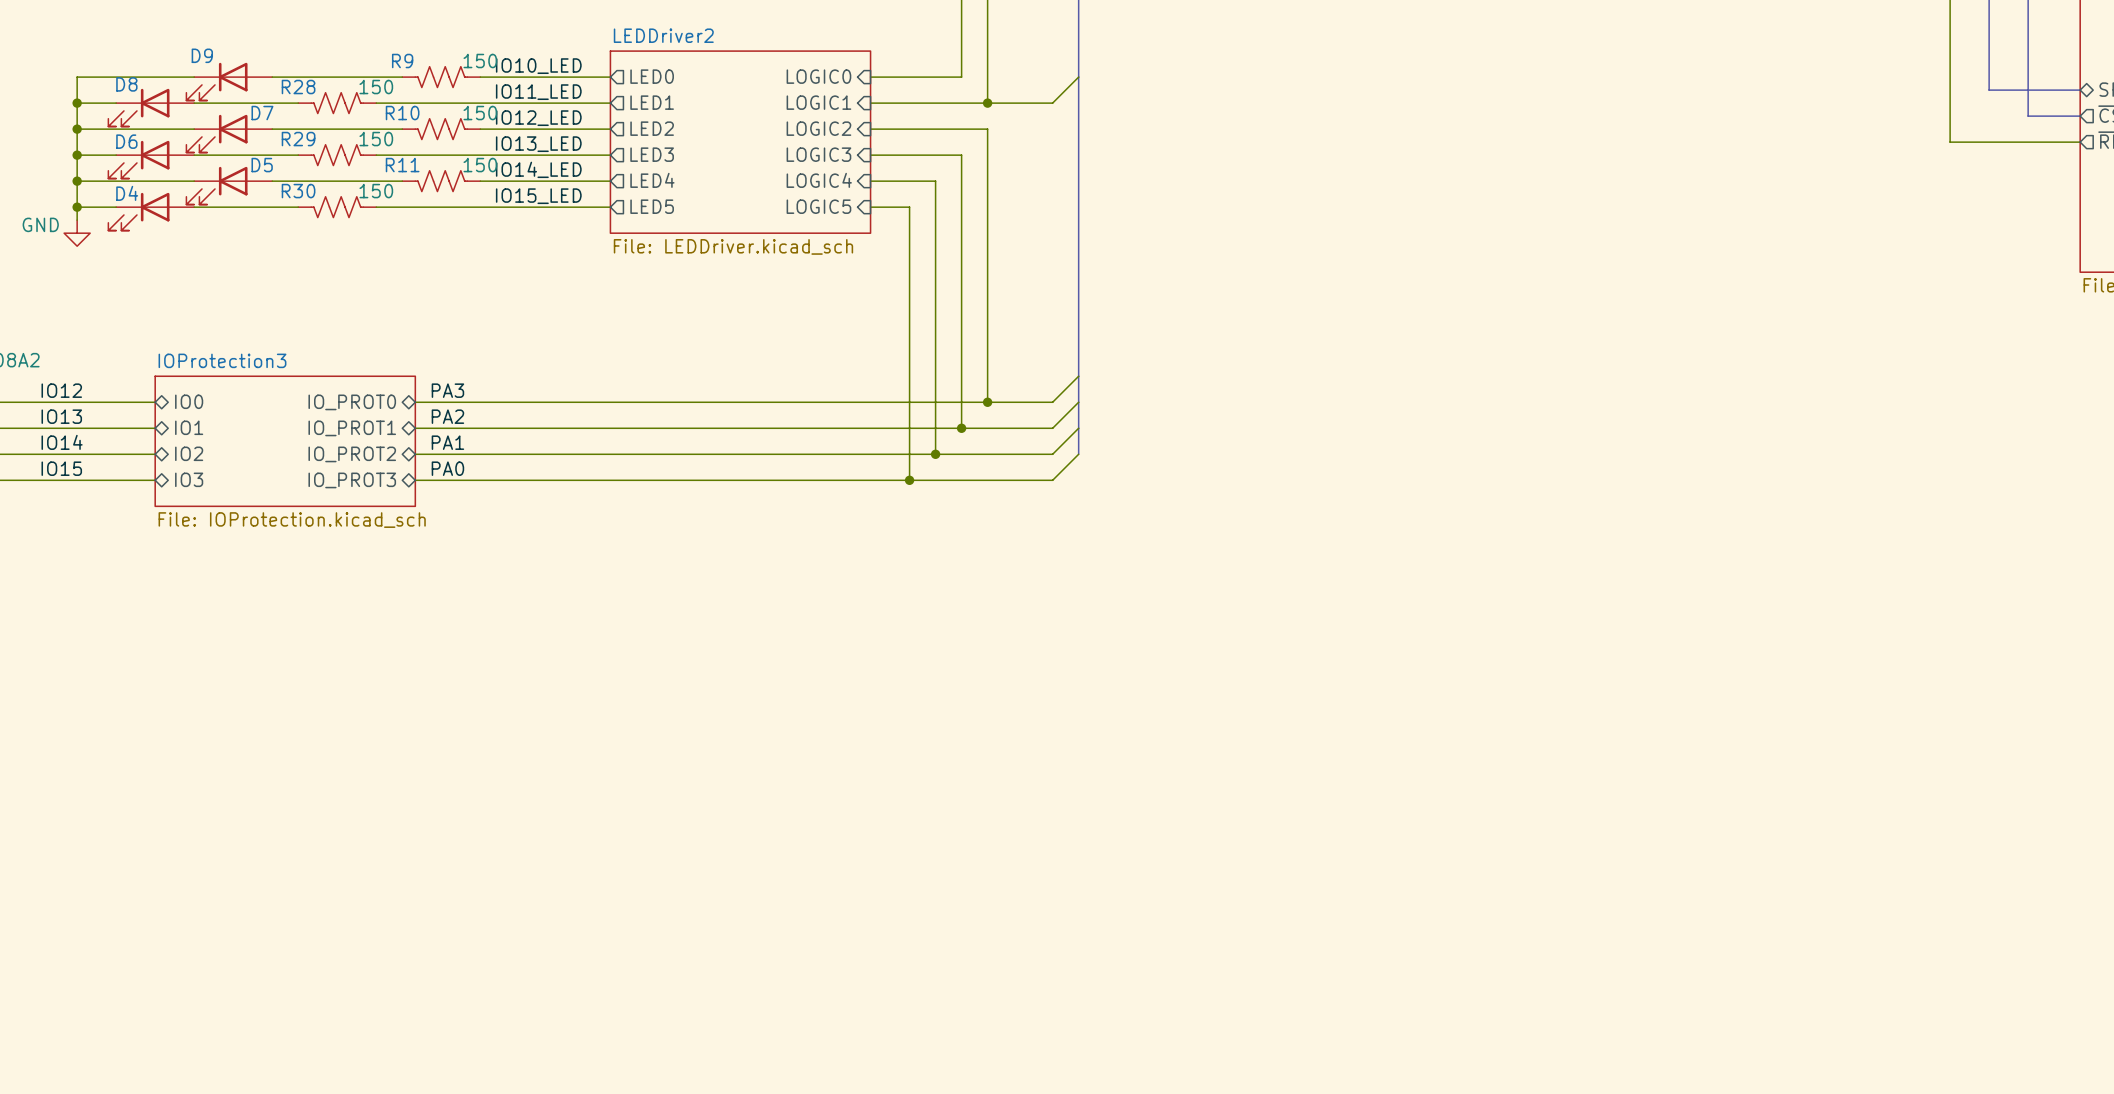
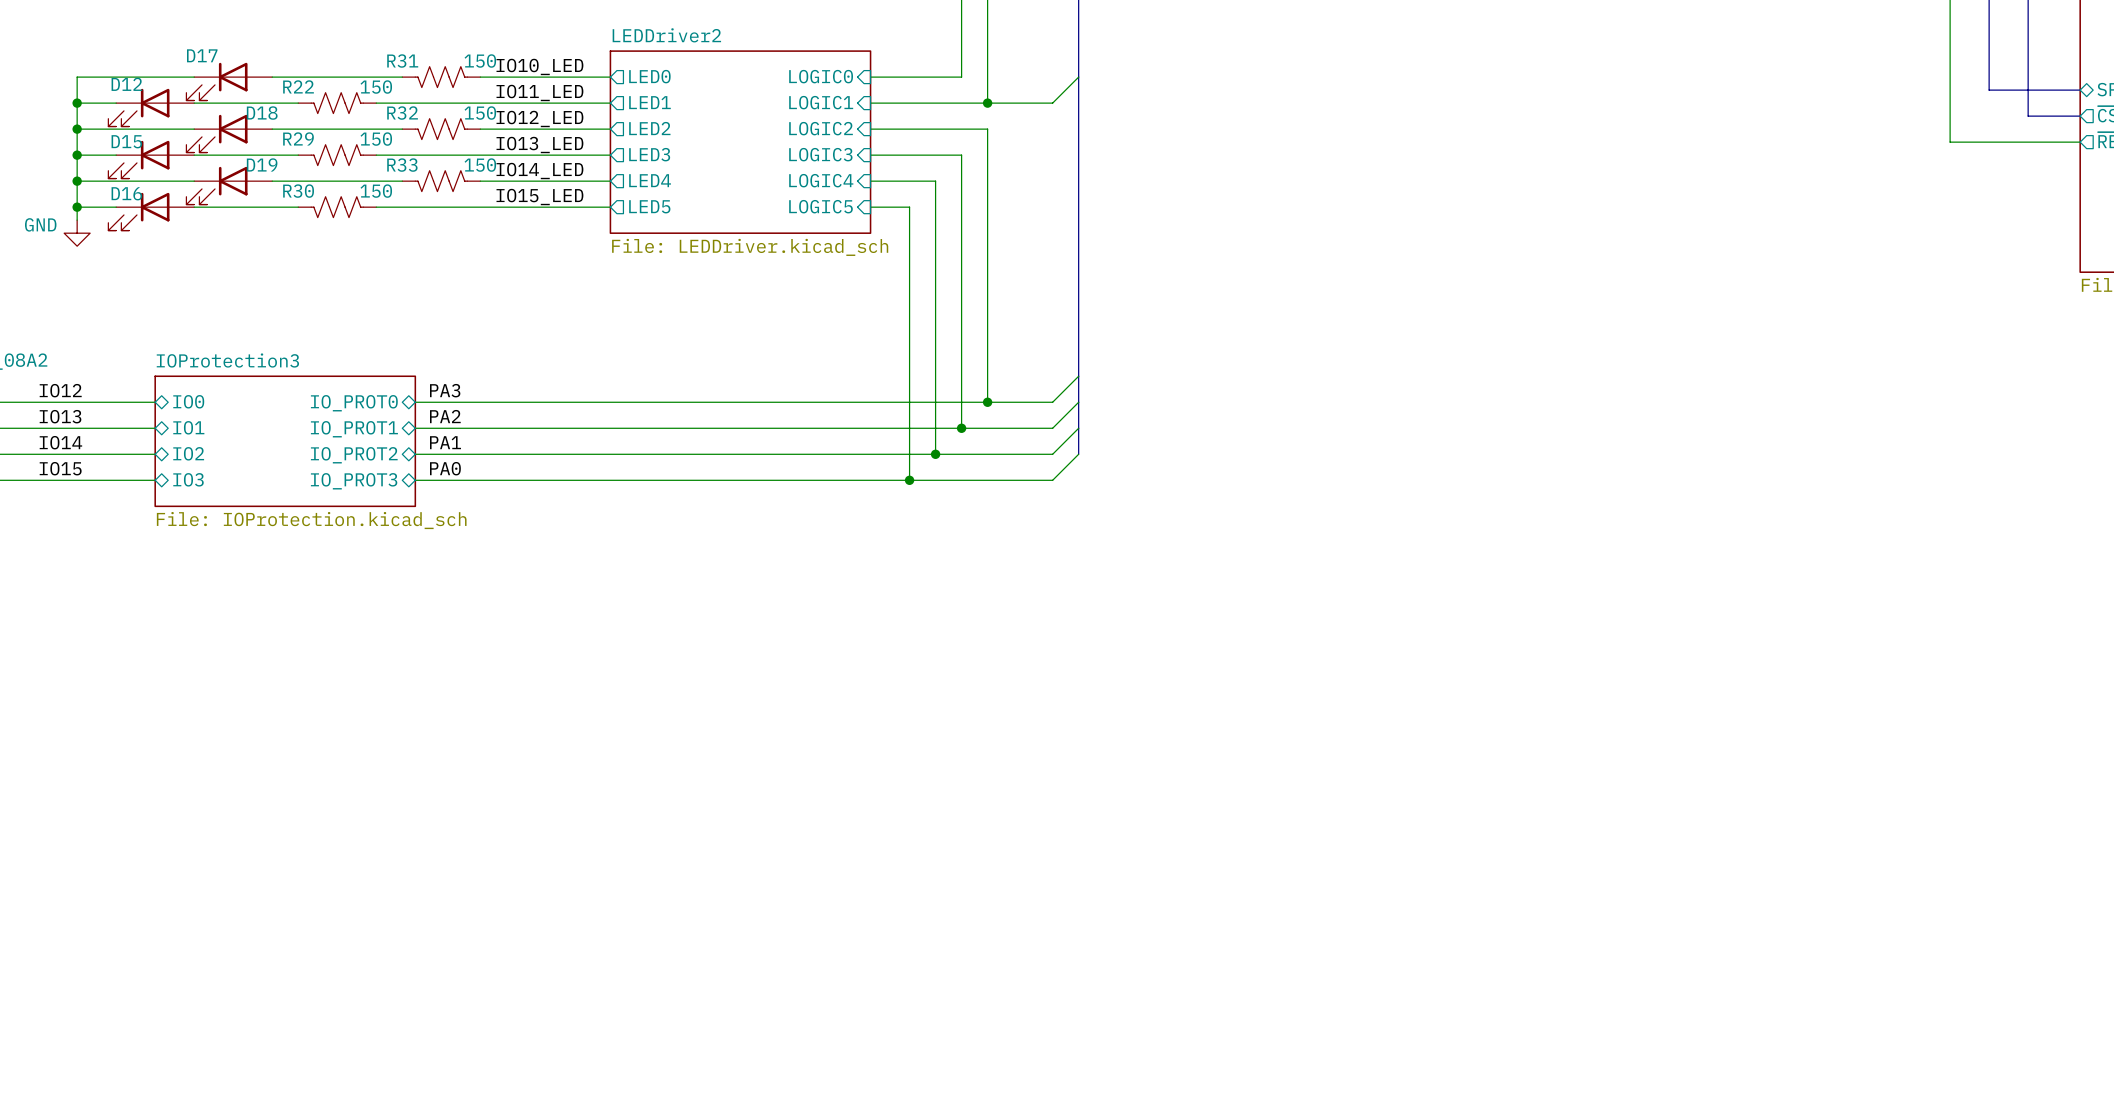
D9 name: D9 (202, 55) -> D17 (202, 55)
R9 name: R9 (402, 61) -> R31 (402, 61)
D8 name: D8 (126, 84) -> D12 (126, 84)
R28 name: R28 (298, 87) -> R22 (298, 86)
D7 name: D7 (262, 113) -> D18 (262, 113)
R10 name: R10 (402, 113) -> R32 (402, 113)
D6 name: D6 (126, 141) -> D15 (126, 141)
D5 name: D5 (262, 165) -> D19 (262, 164)
R11 name: R11 (402, 165) -> R33 (402, 165)
D4 name: D4 (127, 193) -> D16 (126, 193)

